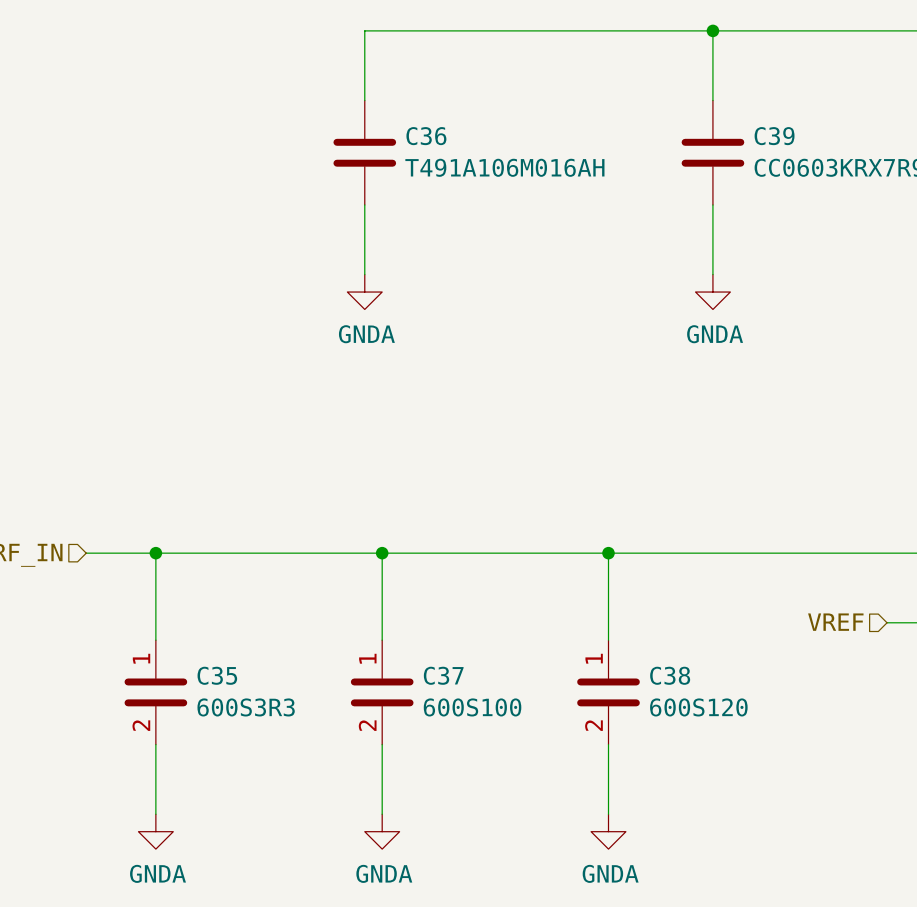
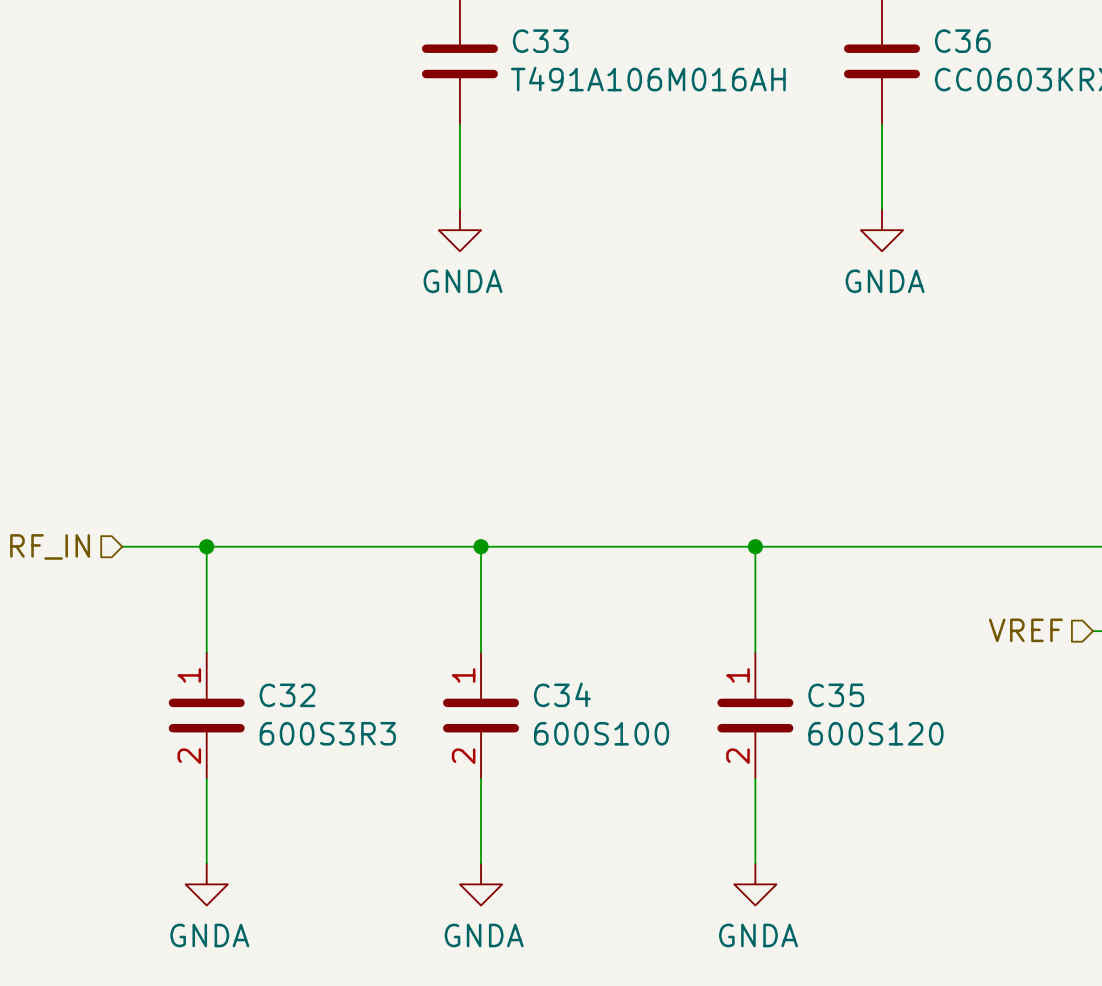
C36 name: C36 (426, 136) -> C33 (540, 41)
C39 name: C39 (774, 136) -> C36 (962, 41)
C35 name: C35 (217, 675) -> C32 (287, 695)
C37 name: C37 (443, 675) -> C34 (562, 694)
C38 name: C38 (670, 675) -> C35 (836, 695)

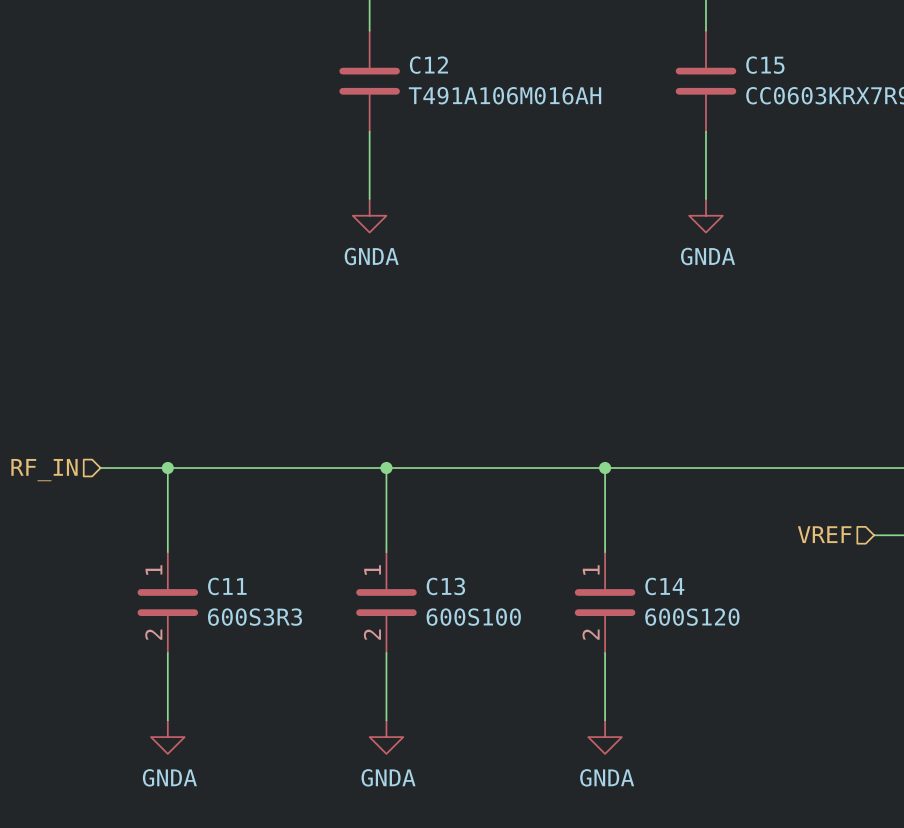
C33 name: C33 (540, 41) -> C12 (428, 65)
C36 name: C36 (962, 41) -> C15 (765, 65)
C34 name: C34 (562, 694) -> C13 (445, 586)
C32 name: C32 (287, 695) -> C11 (227, 586)
C35 name: C35 (836, 695) -> C14 (664, 586)

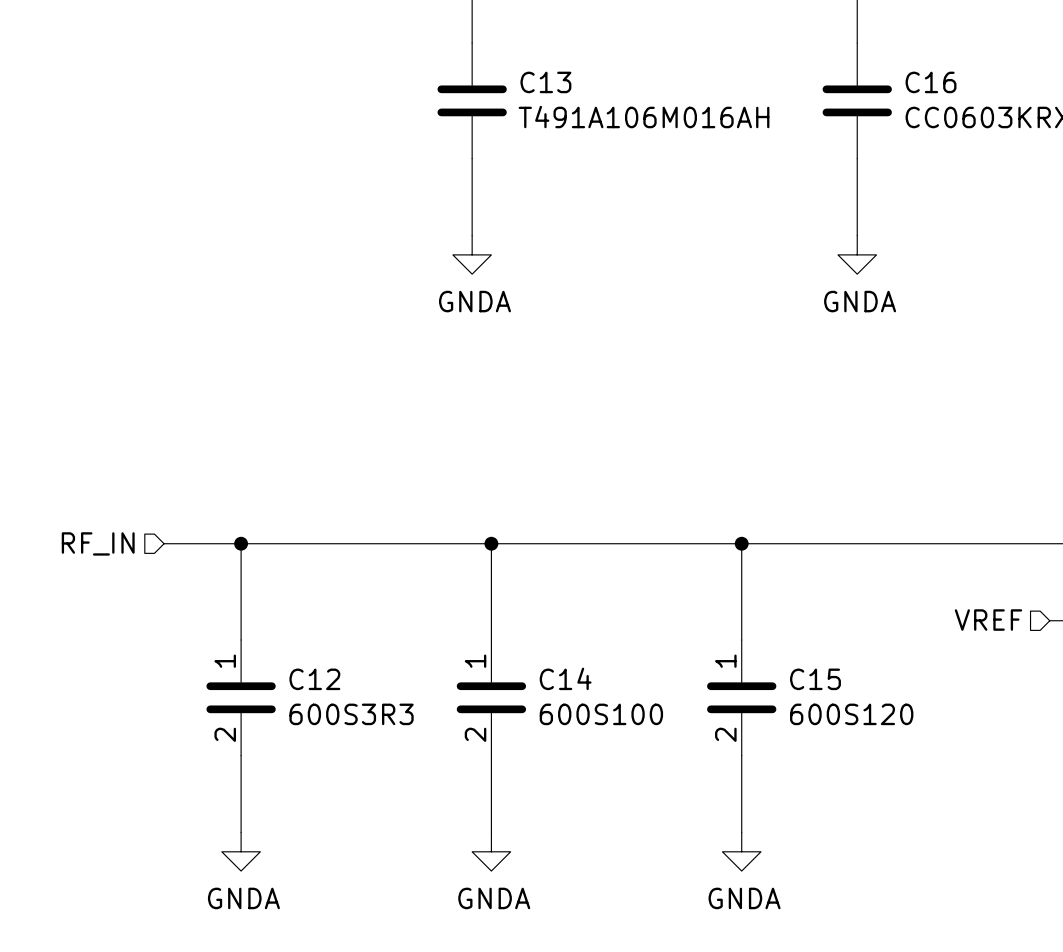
C12 name: C12 (428, 65) -> C13 (545, 82)
C15 name: C15 (765, 65) -> C16 (931, 82)
C11 name: C11 (227, 586) -> C12 (314, 679)
C13 name: C13 (445, 586) -> C14 (565, 678)
C14 name: C14 (664, 586) -> C15 (815, 679)

